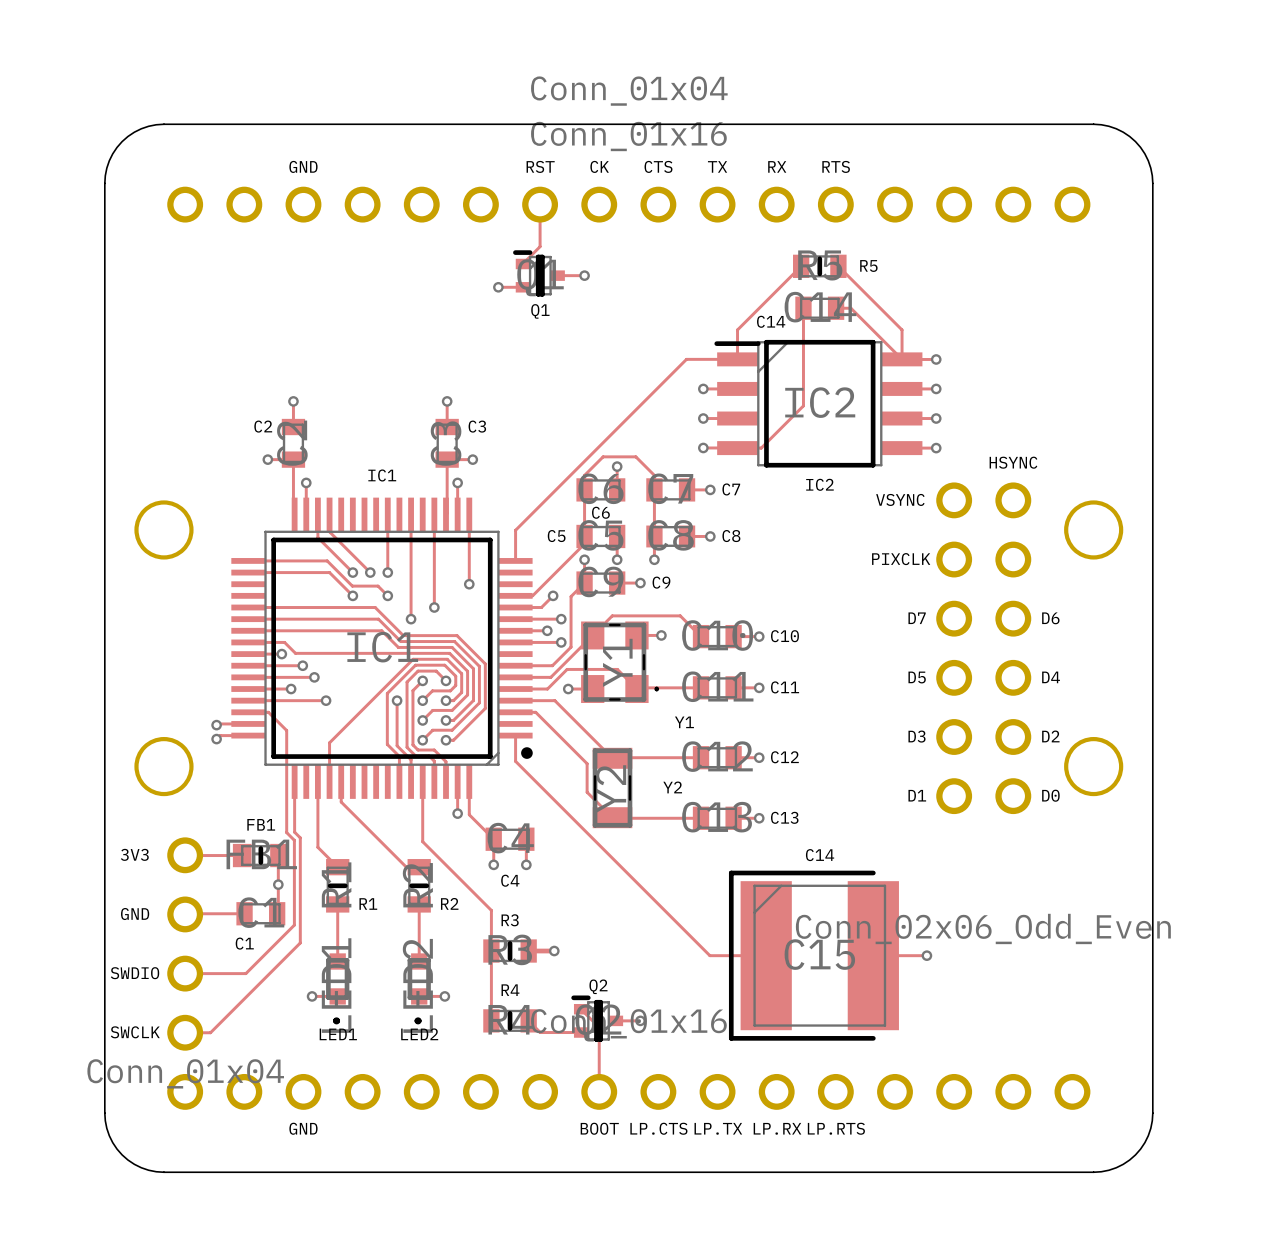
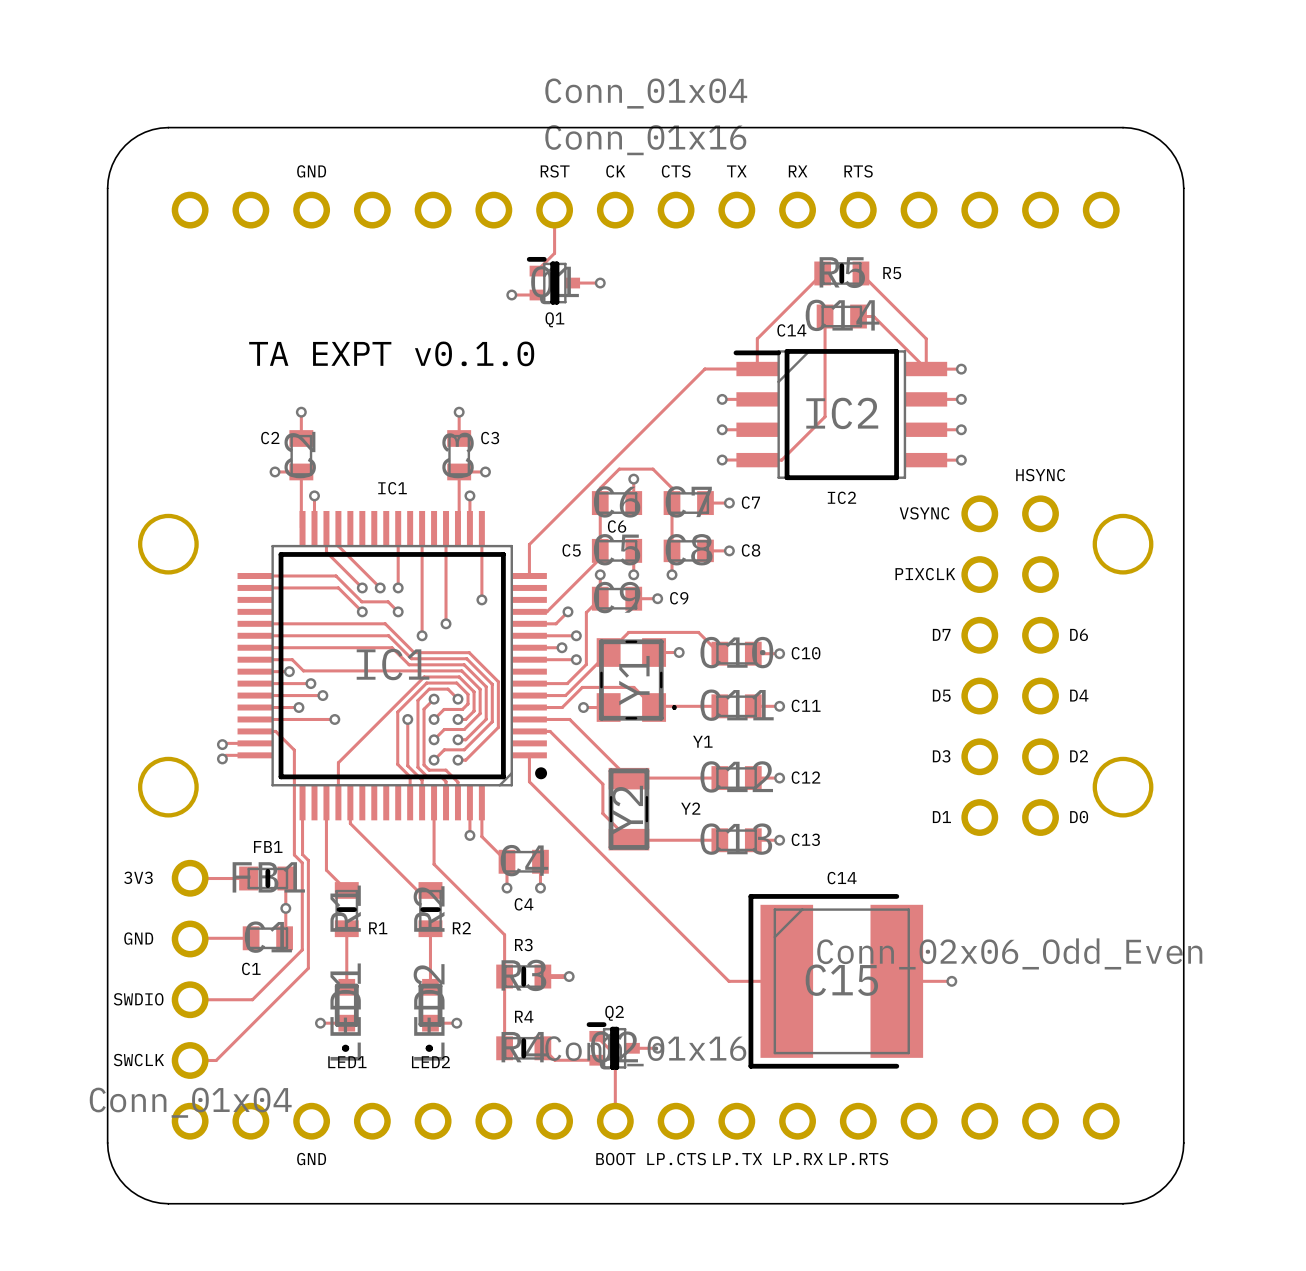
text: none -> TA EXPT v0.1.0 (391, 353)

